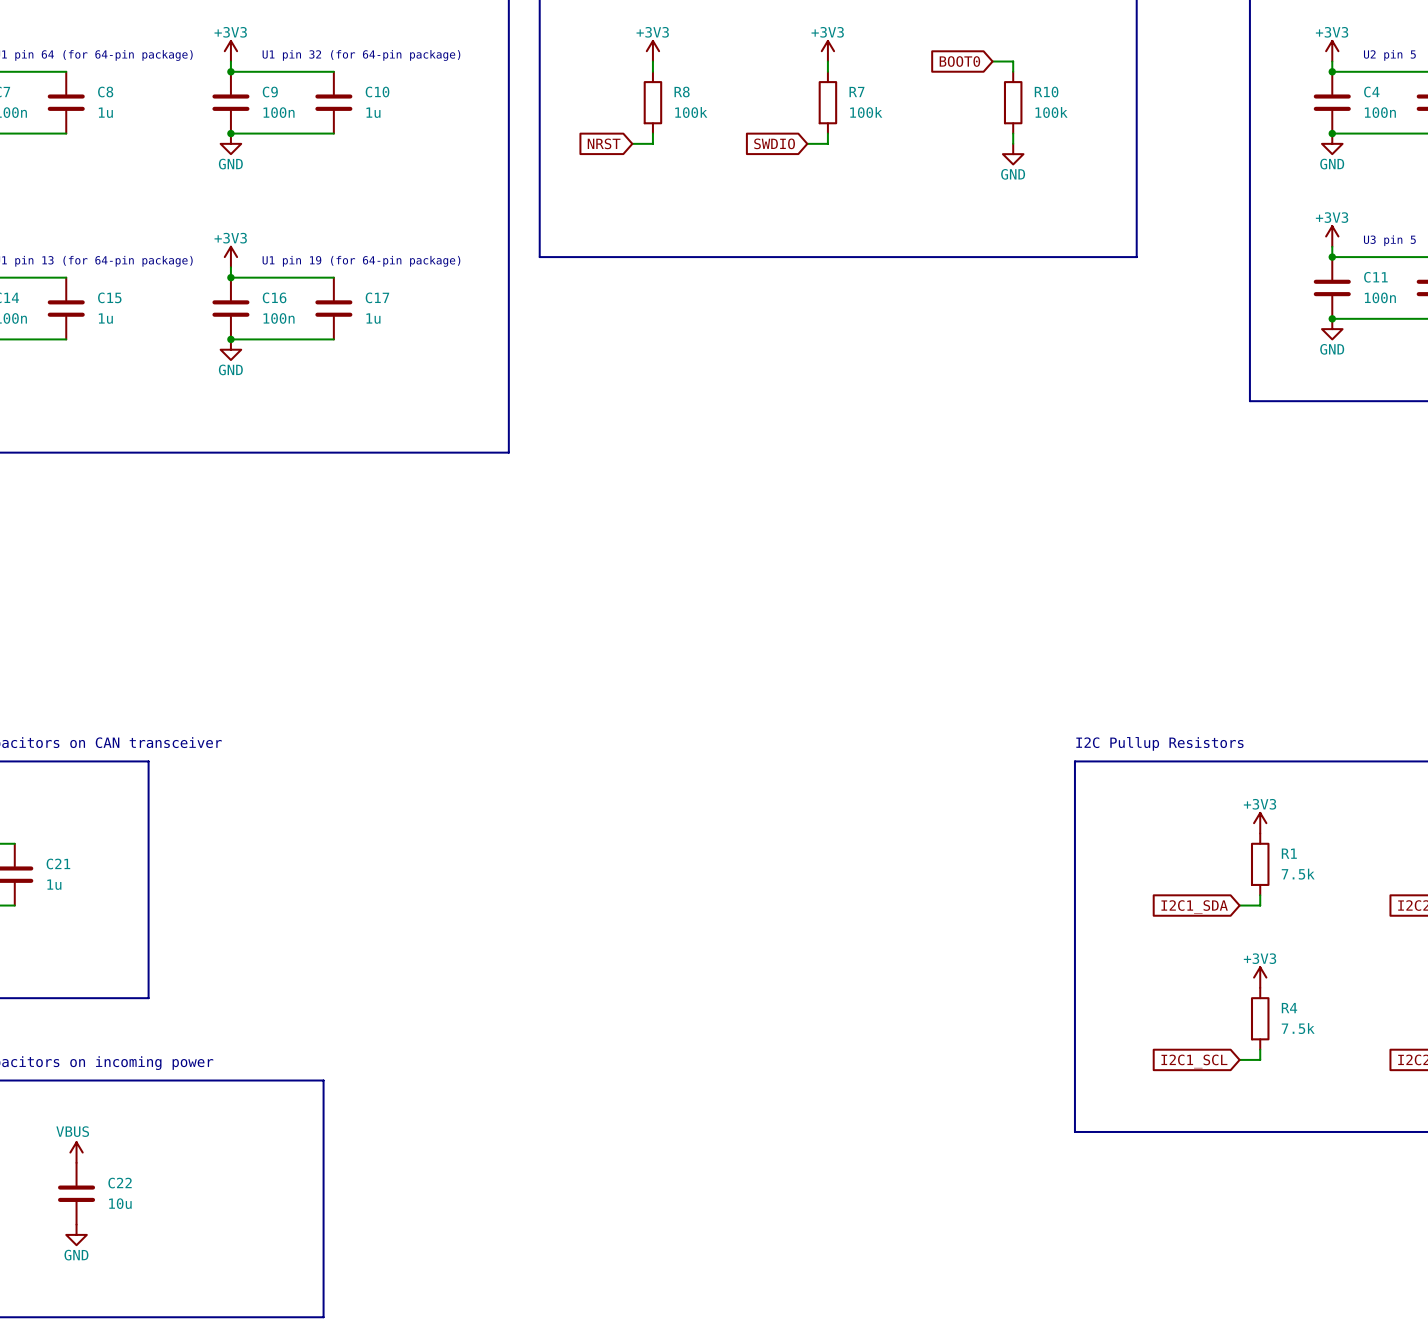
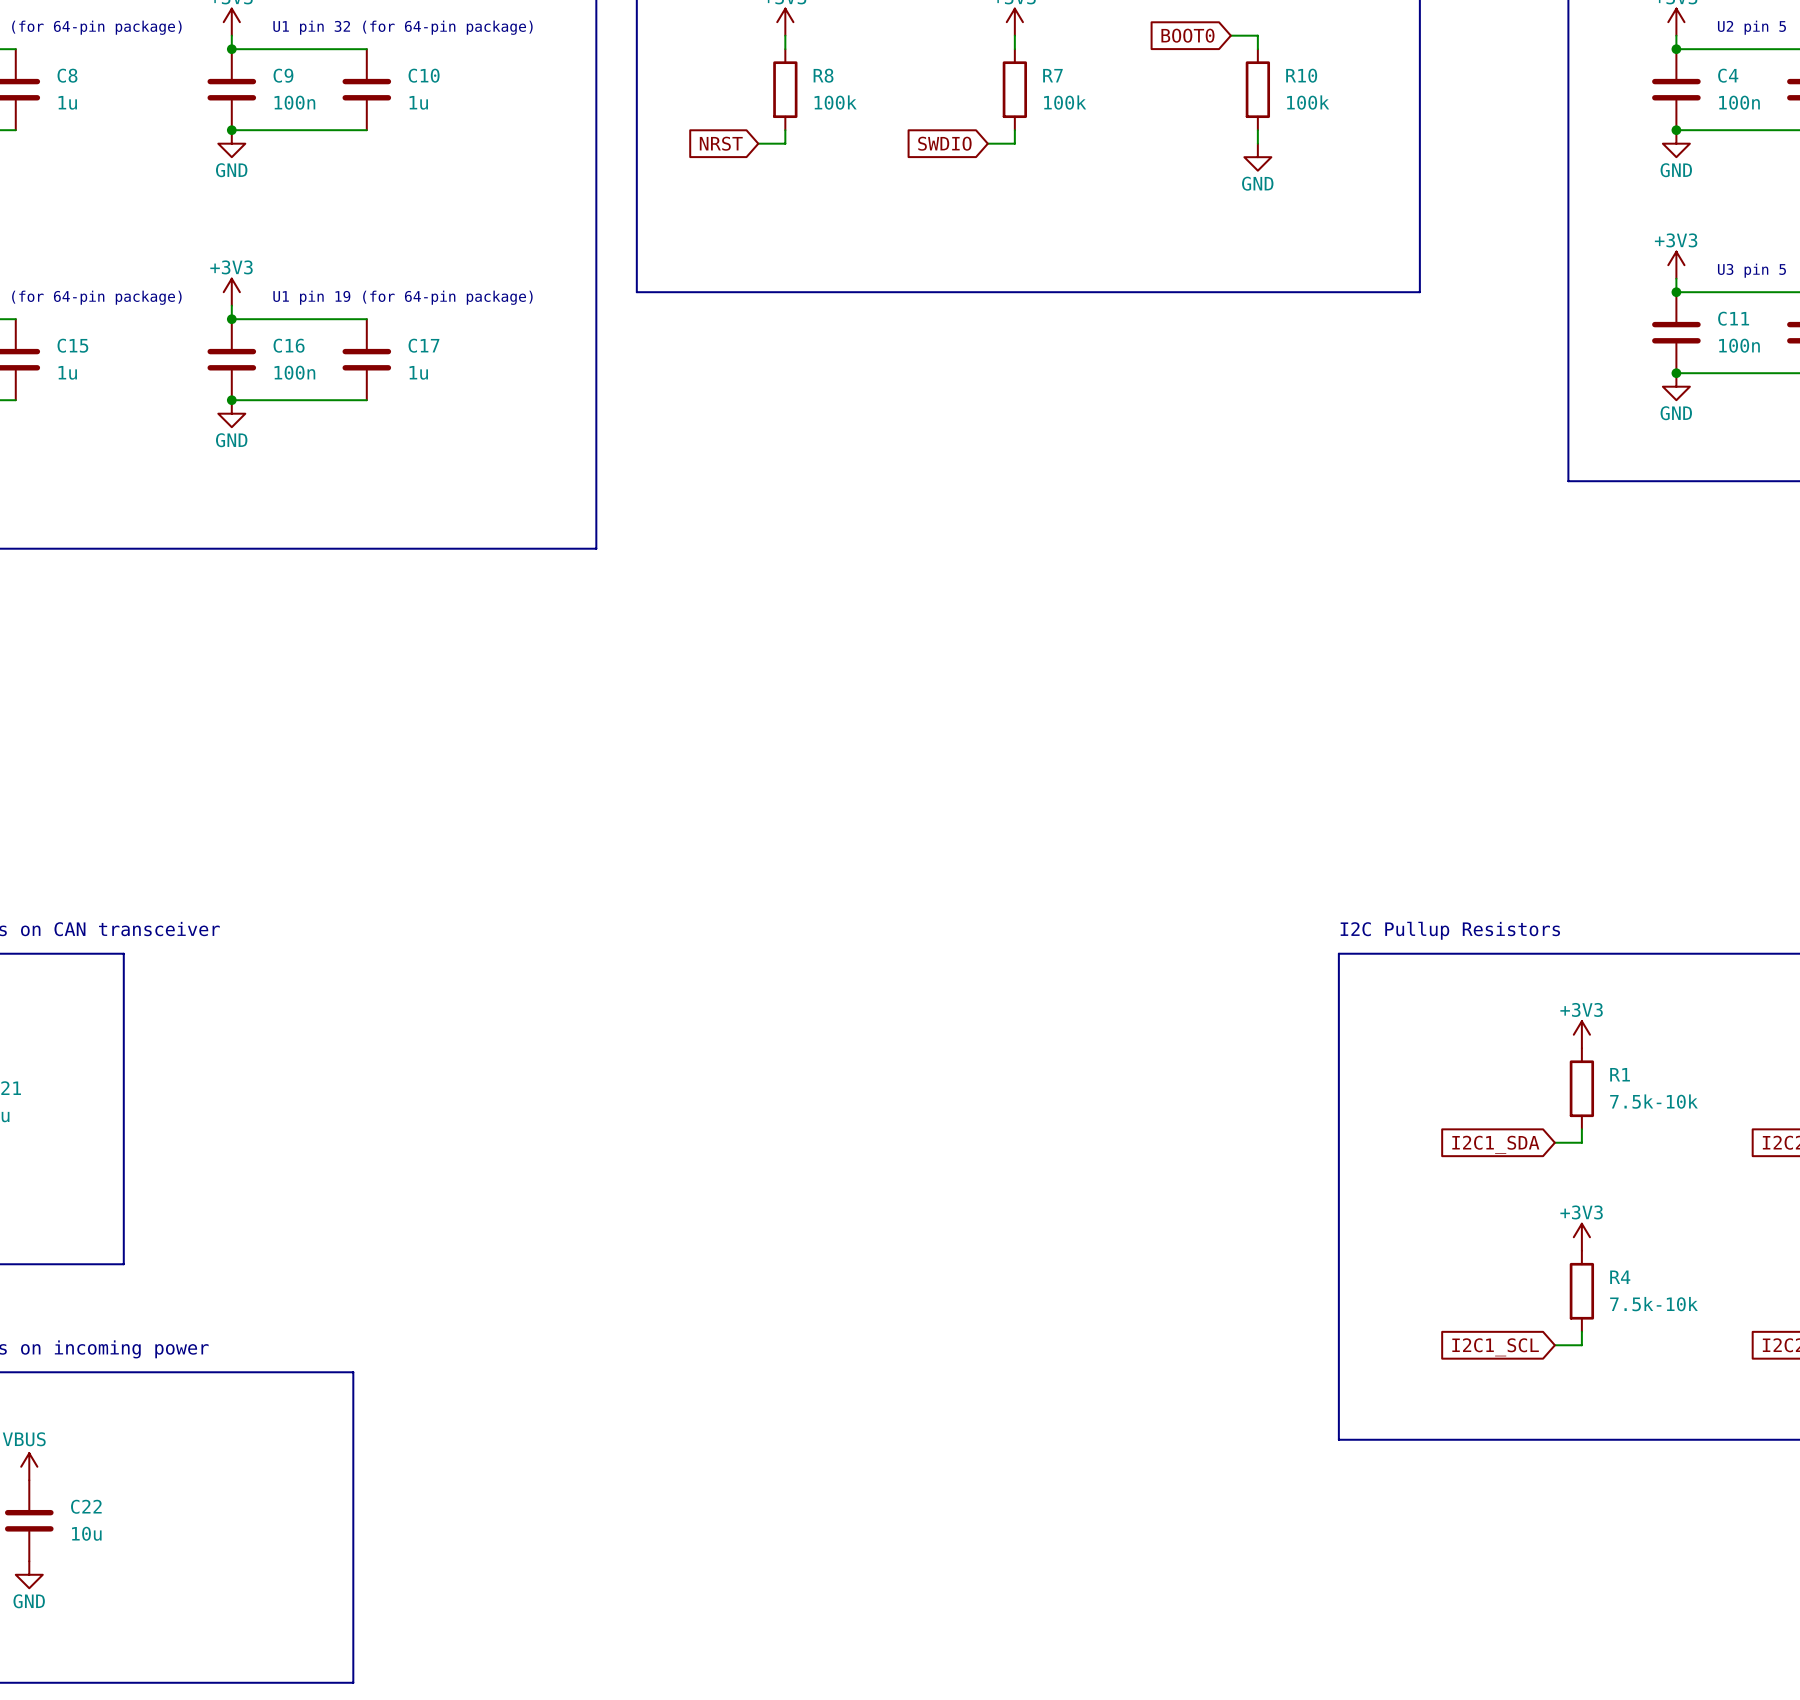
R1 value: 7.5k (1298, 874) -> 7.5k-10k (1653, 1101)
R4 value: 7.5k (1298, 1028) -> 7.5k-10k (1653, 1304)

